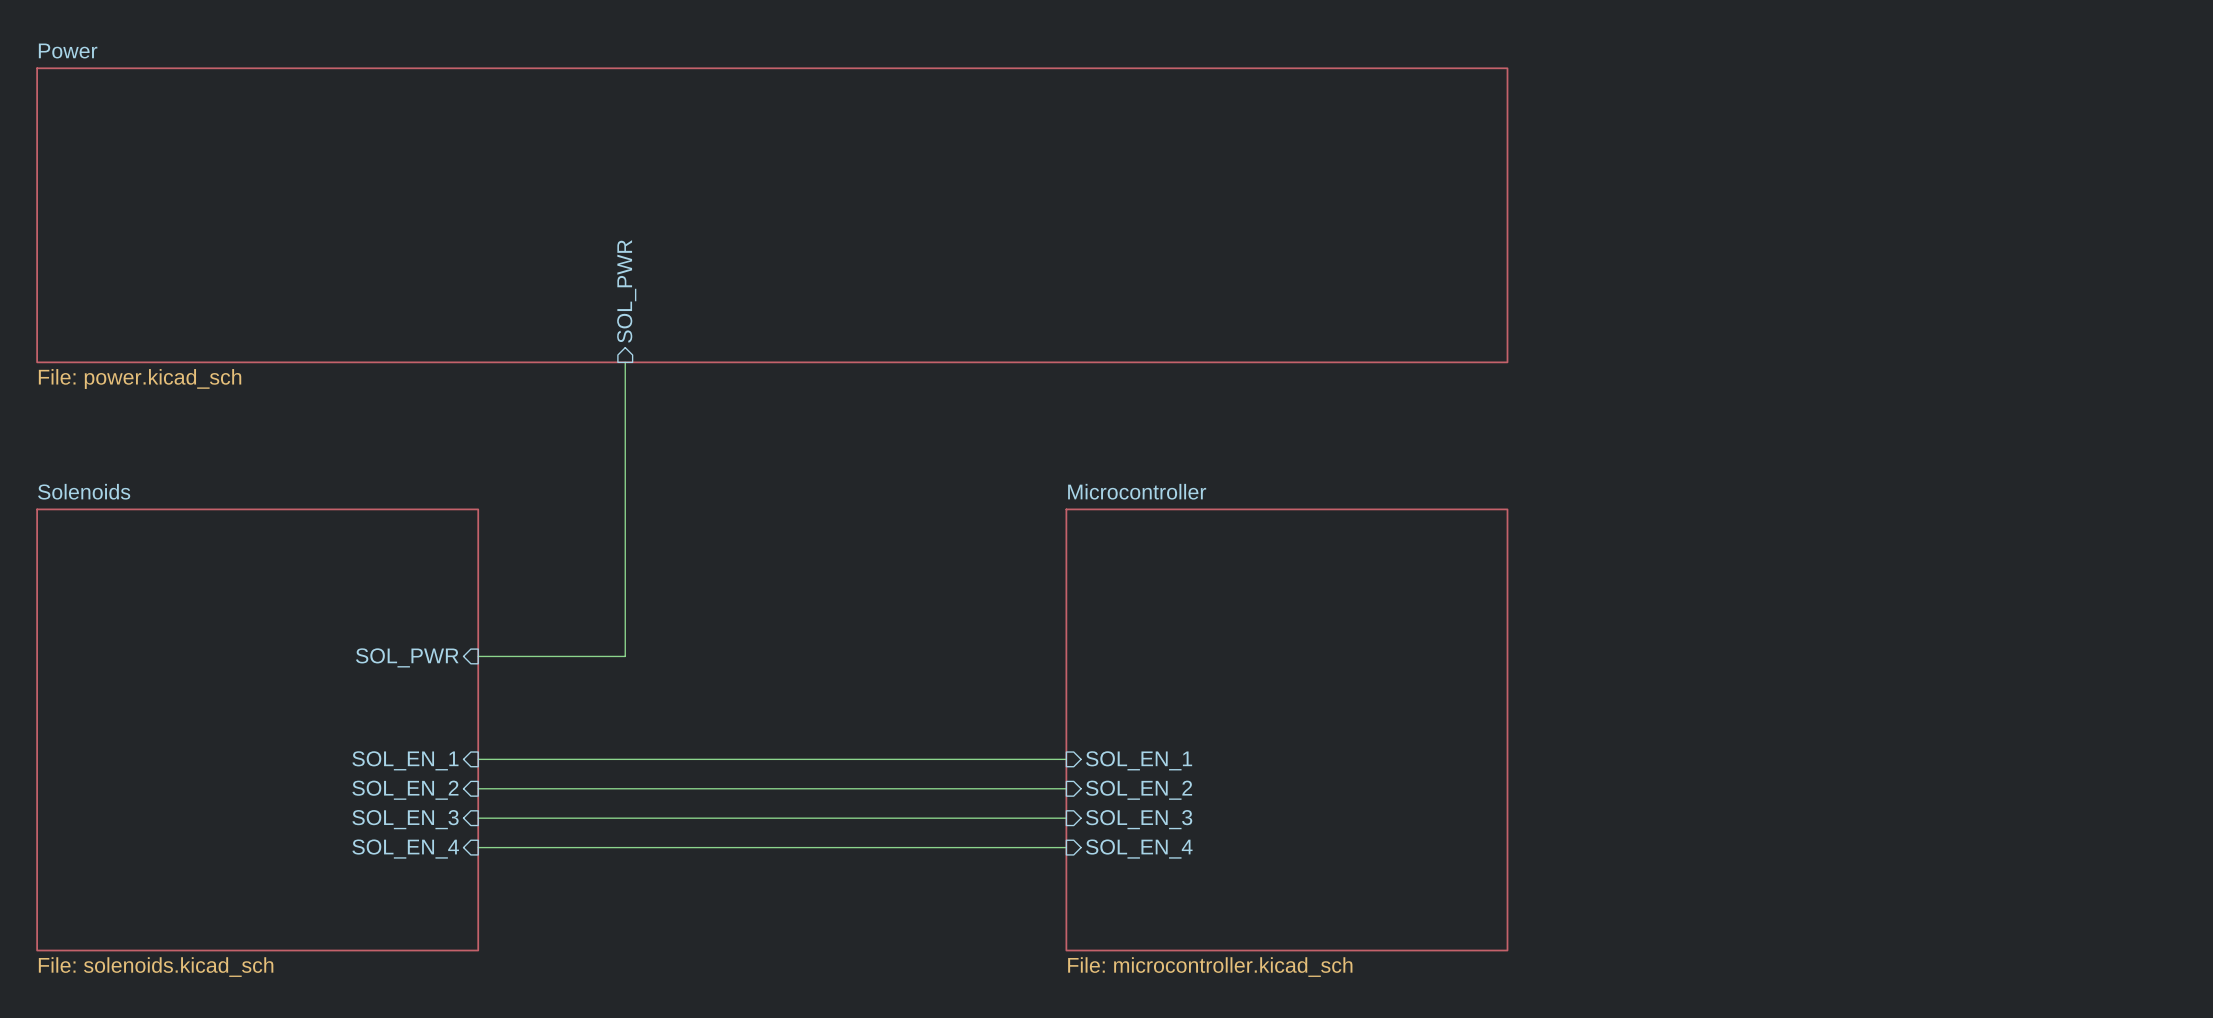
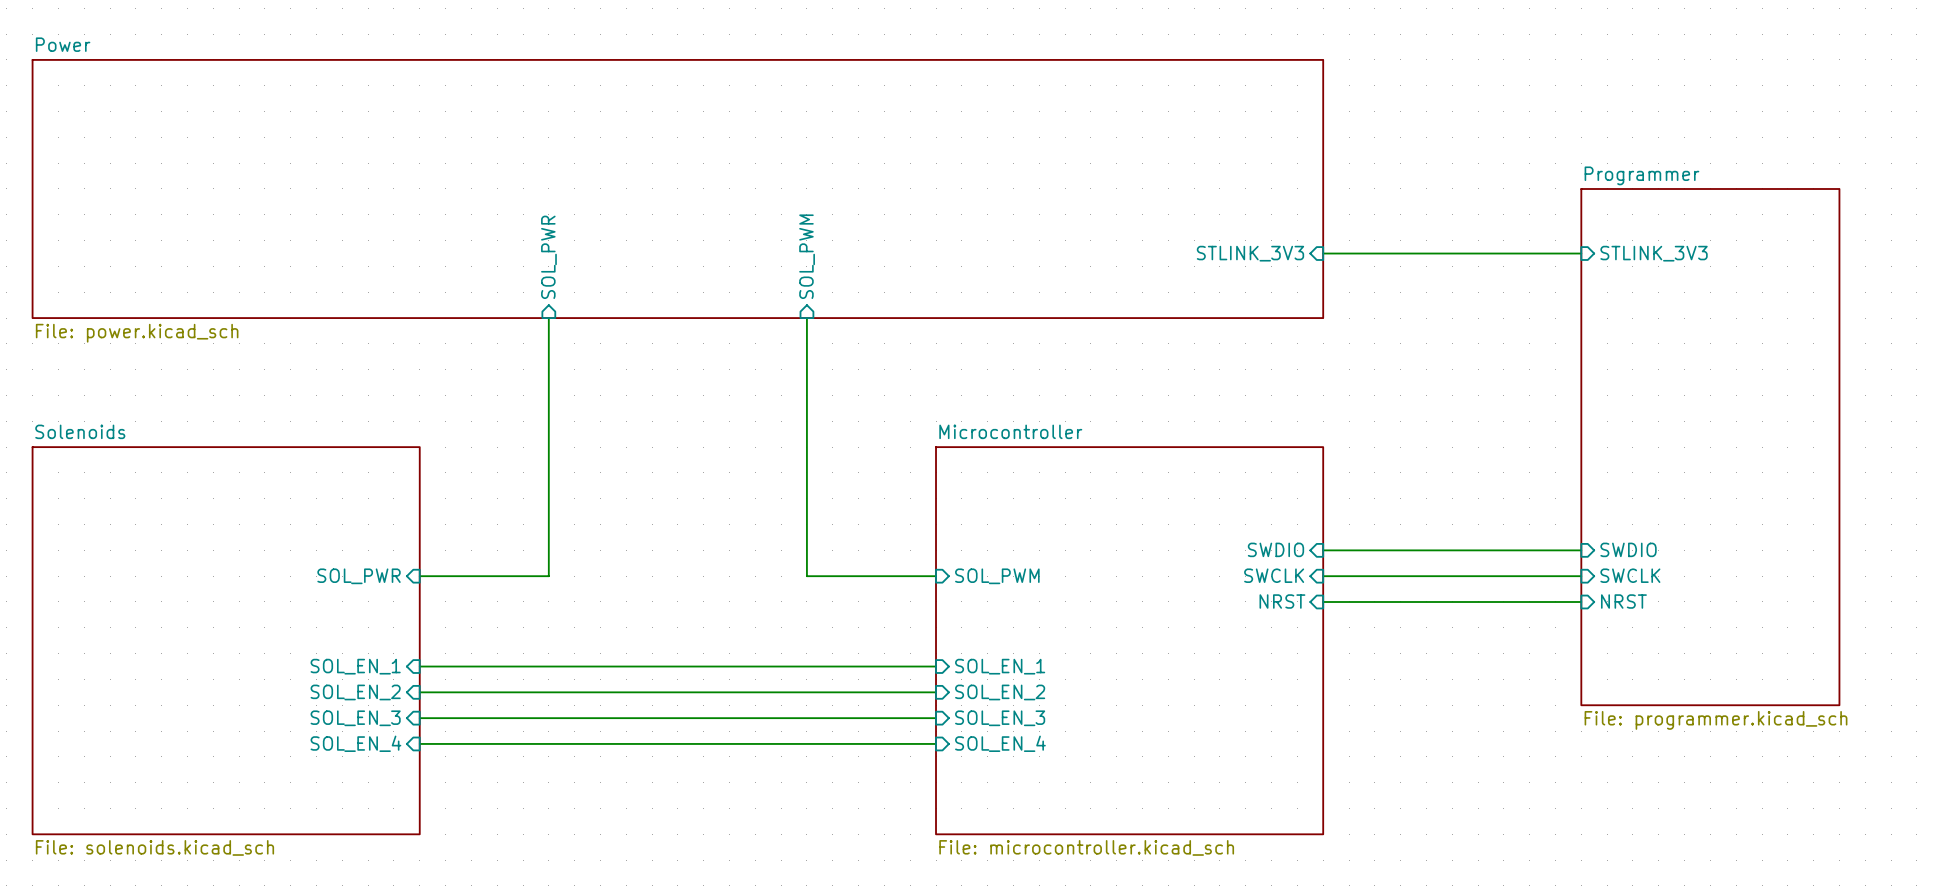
wire: none -> (1323, 253) (1581, 253)
sheet pin: none -> SOL_PWM (807, 256)
sheet pin: none -> STLINK_3V3 (1250, 253)
sheet pin: none -> STLINK_3V3 (1654, 253)
wire: none -> (806, 318) (806, 576) (936, 576)
sheet Programmer: none -> File: programmer.kicad_sch (1710, 447)
sheet pin: none -> SWDIO (1275, 549)
sheet pin: none -> SWDIO (1628, 549)
wire: none -> (1323, 550) (1581, 550)
sheet pin: none -> SWCLK (1274, 575)
sheet pin: none -> SWCLK (1630, 575)
wire: none -> (1323, 576) (1581, 576)
sheet pin: none -> SOL_PWM (997, 576)
sheet pin: none -> NRST (1282, 601)
wire: none -> (1323, 601) (1581, 601)
sheet pin: none -> NRST (1623, 601)

